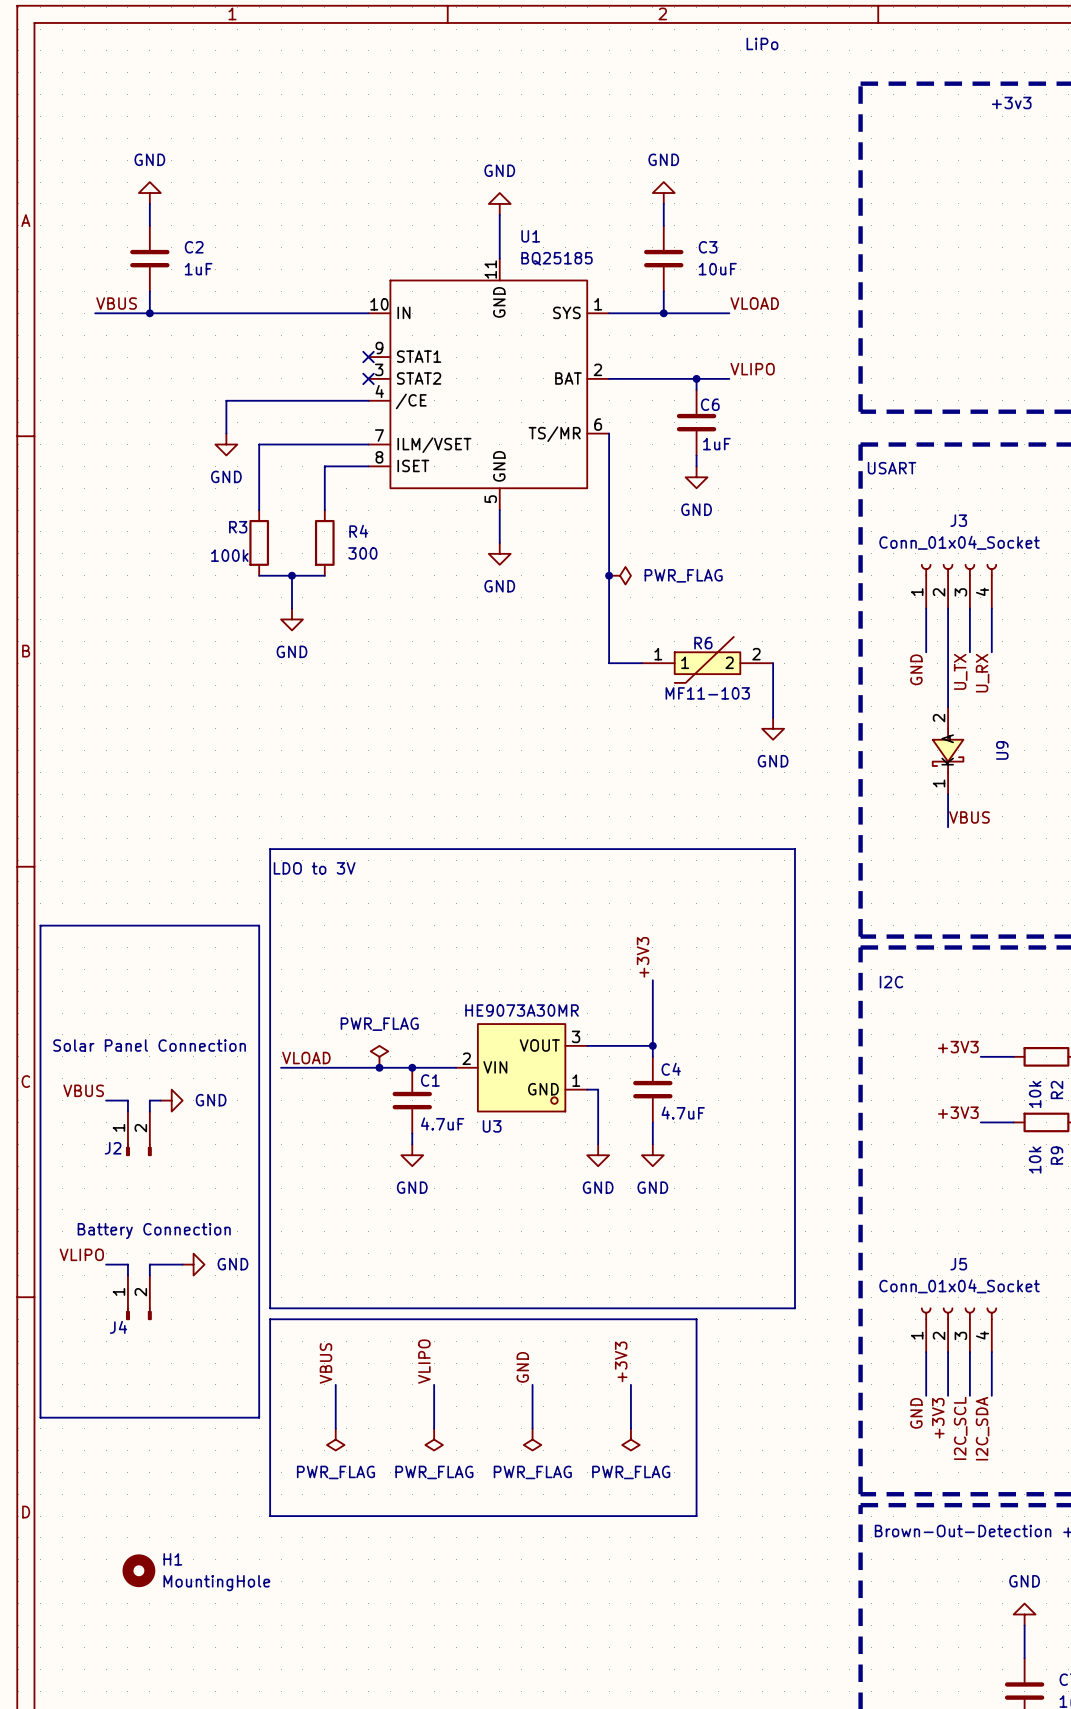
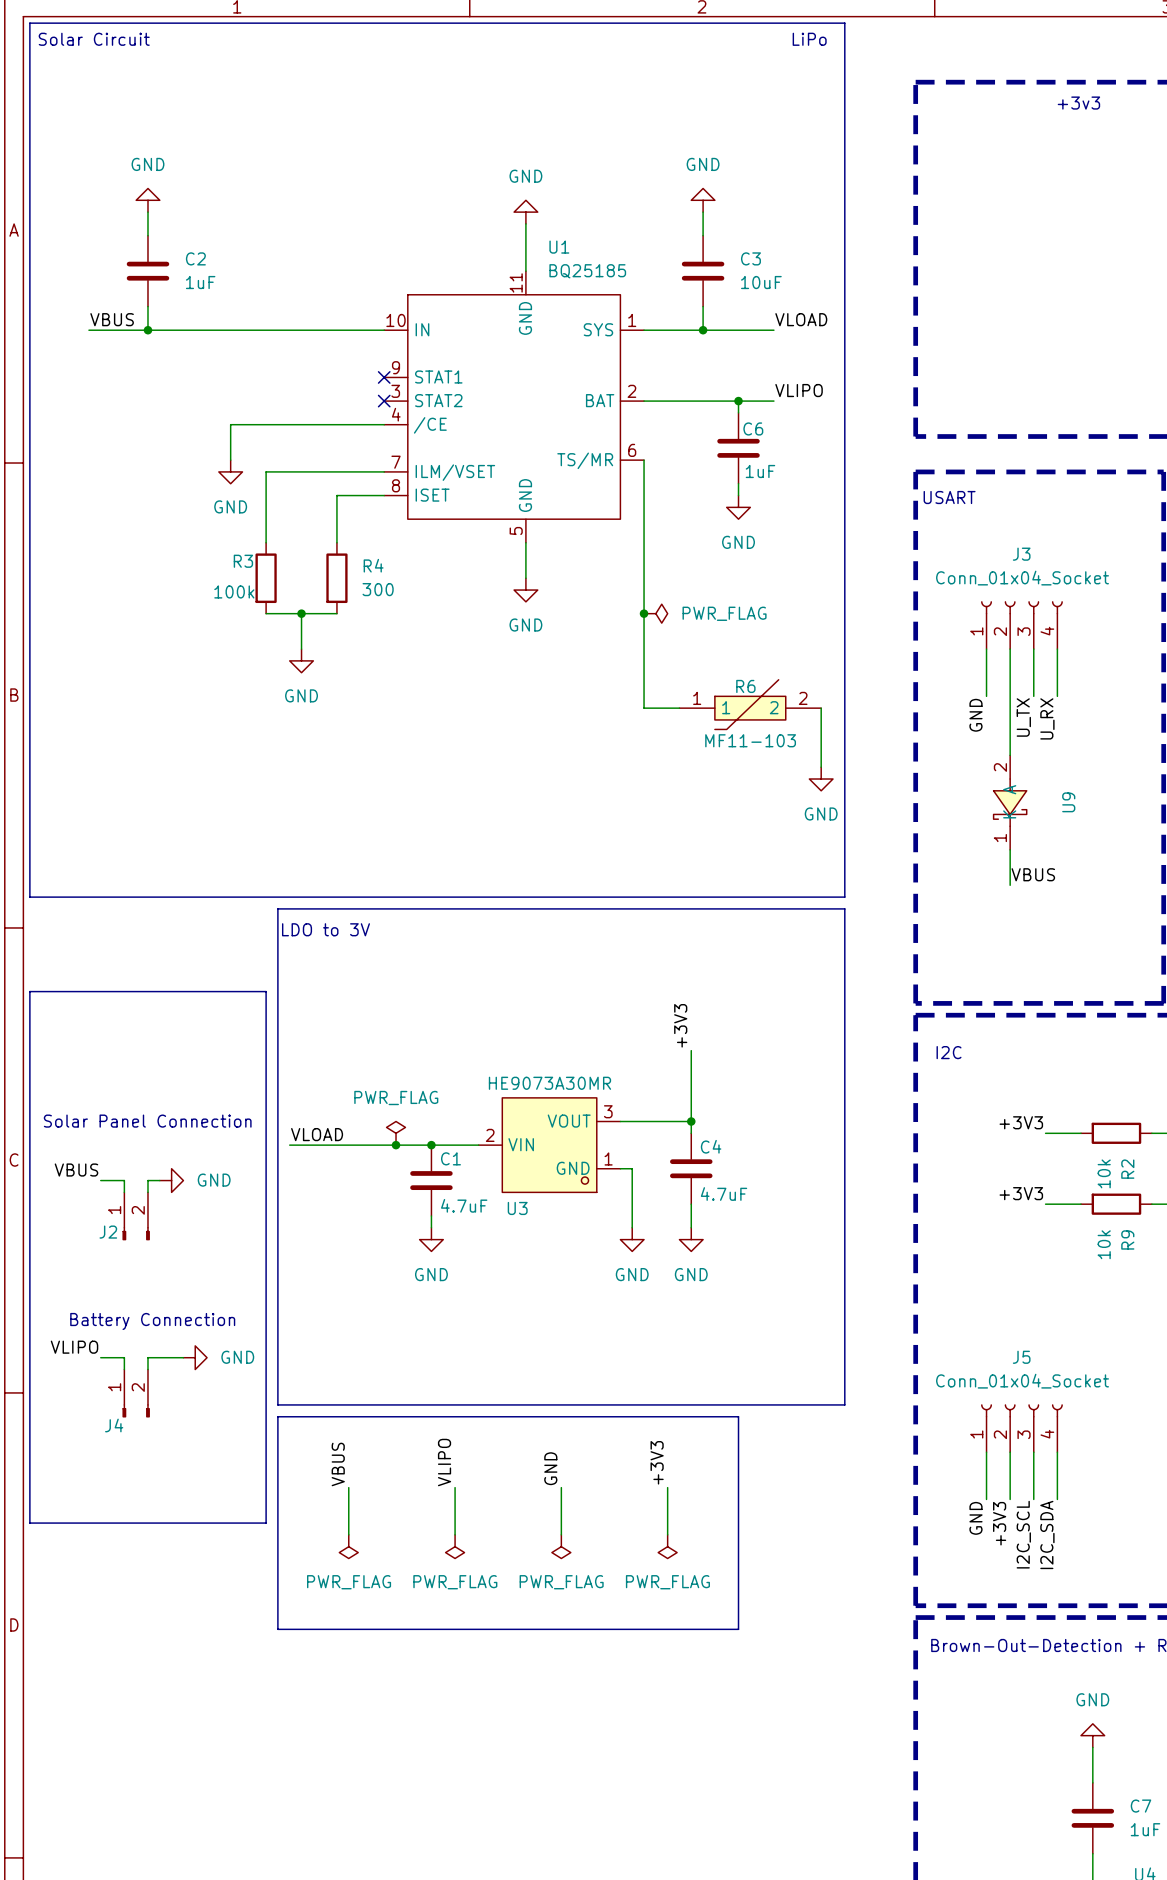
line: none -> (29, 23) (844, 23) (844, 897) (29, 897) (29, 23)
text: none -> Solar Circuit (94, 39)
H1: MountingHole (138, 1570) -> none

